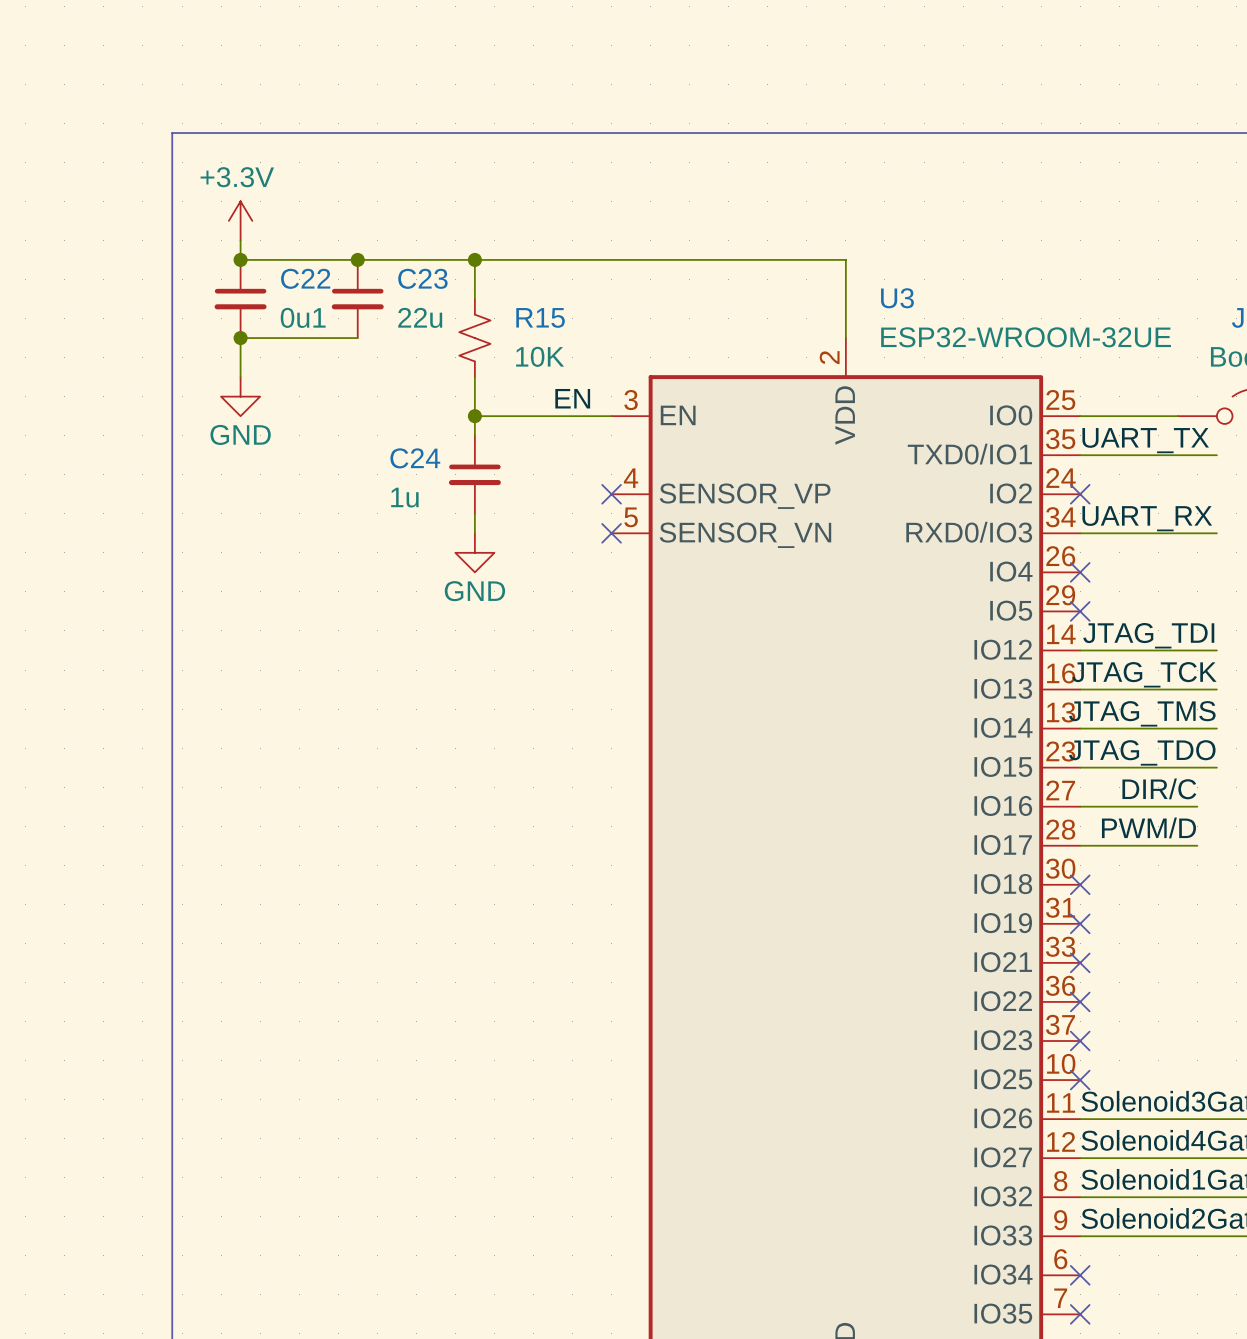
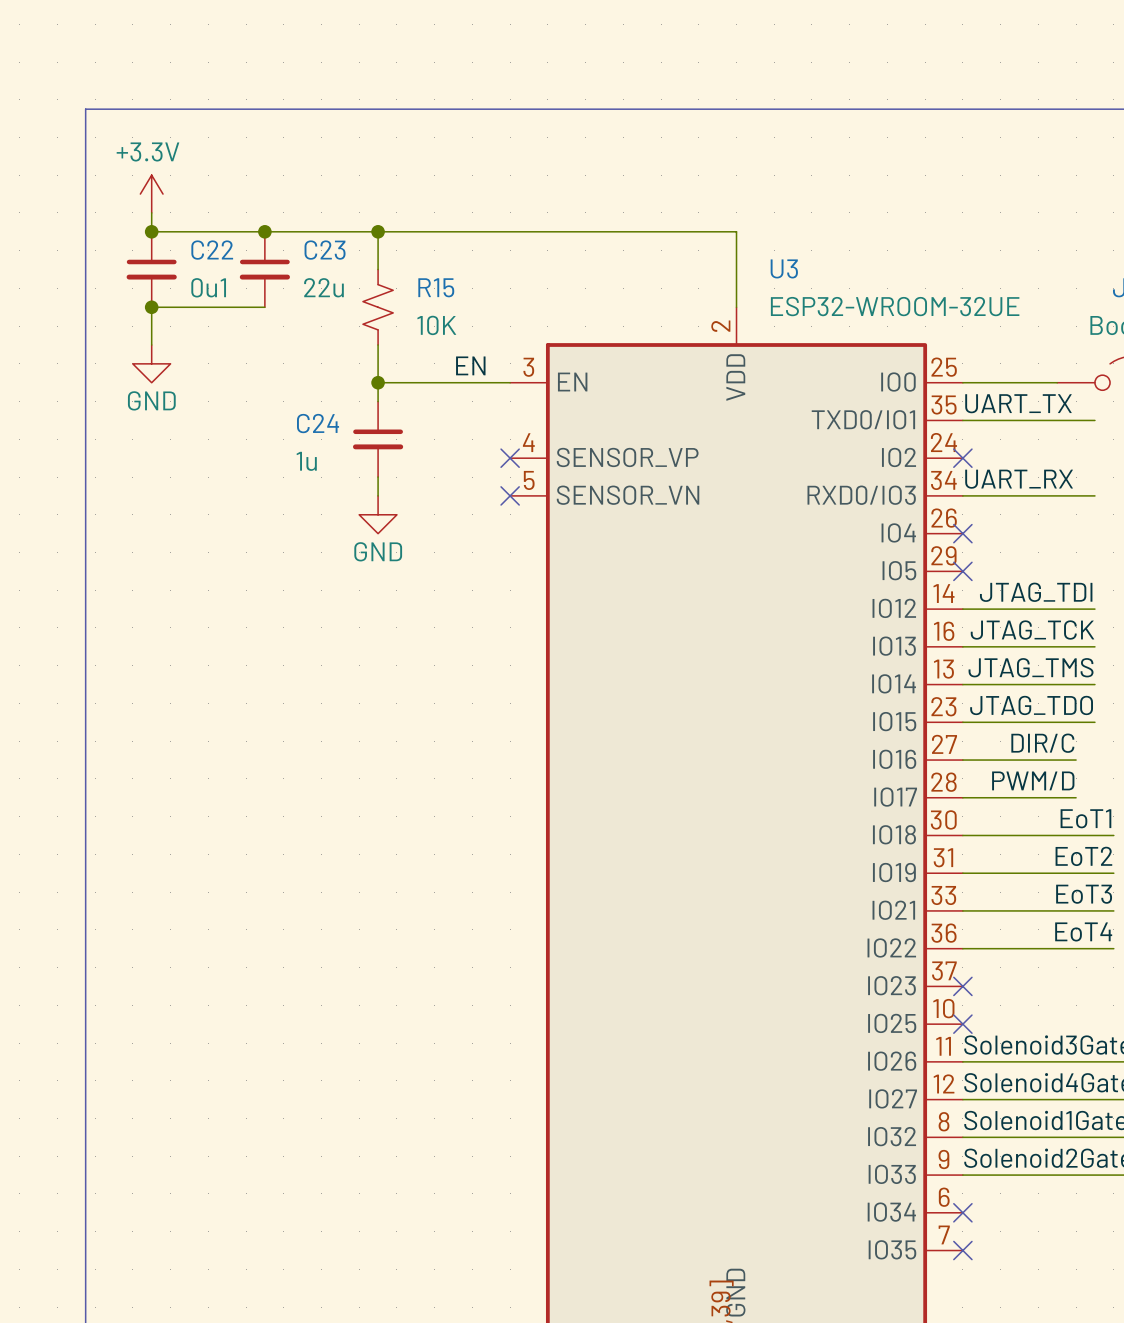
label: none -> EoT1 (1085, 818)
wire: none -> (962, 835) (1113, 835)
no-connect mark: (1080, 884) -> none
label: none -> EoT2 (1083, 856)
wire: none -> (962, 873) (1113, 873)
no-connect mark: (1080, 923) -> none
label: none -> EoT3 (1084, 894)
wire: none -> (962, 910) (1113, 910)
no-connect mark: (1080, 962) -> none
label: none -> EoT4 (1083, 931)
wire: none -> (962, 948) (1113, 948)
no-connect mark: (1080, 1001) -> none

